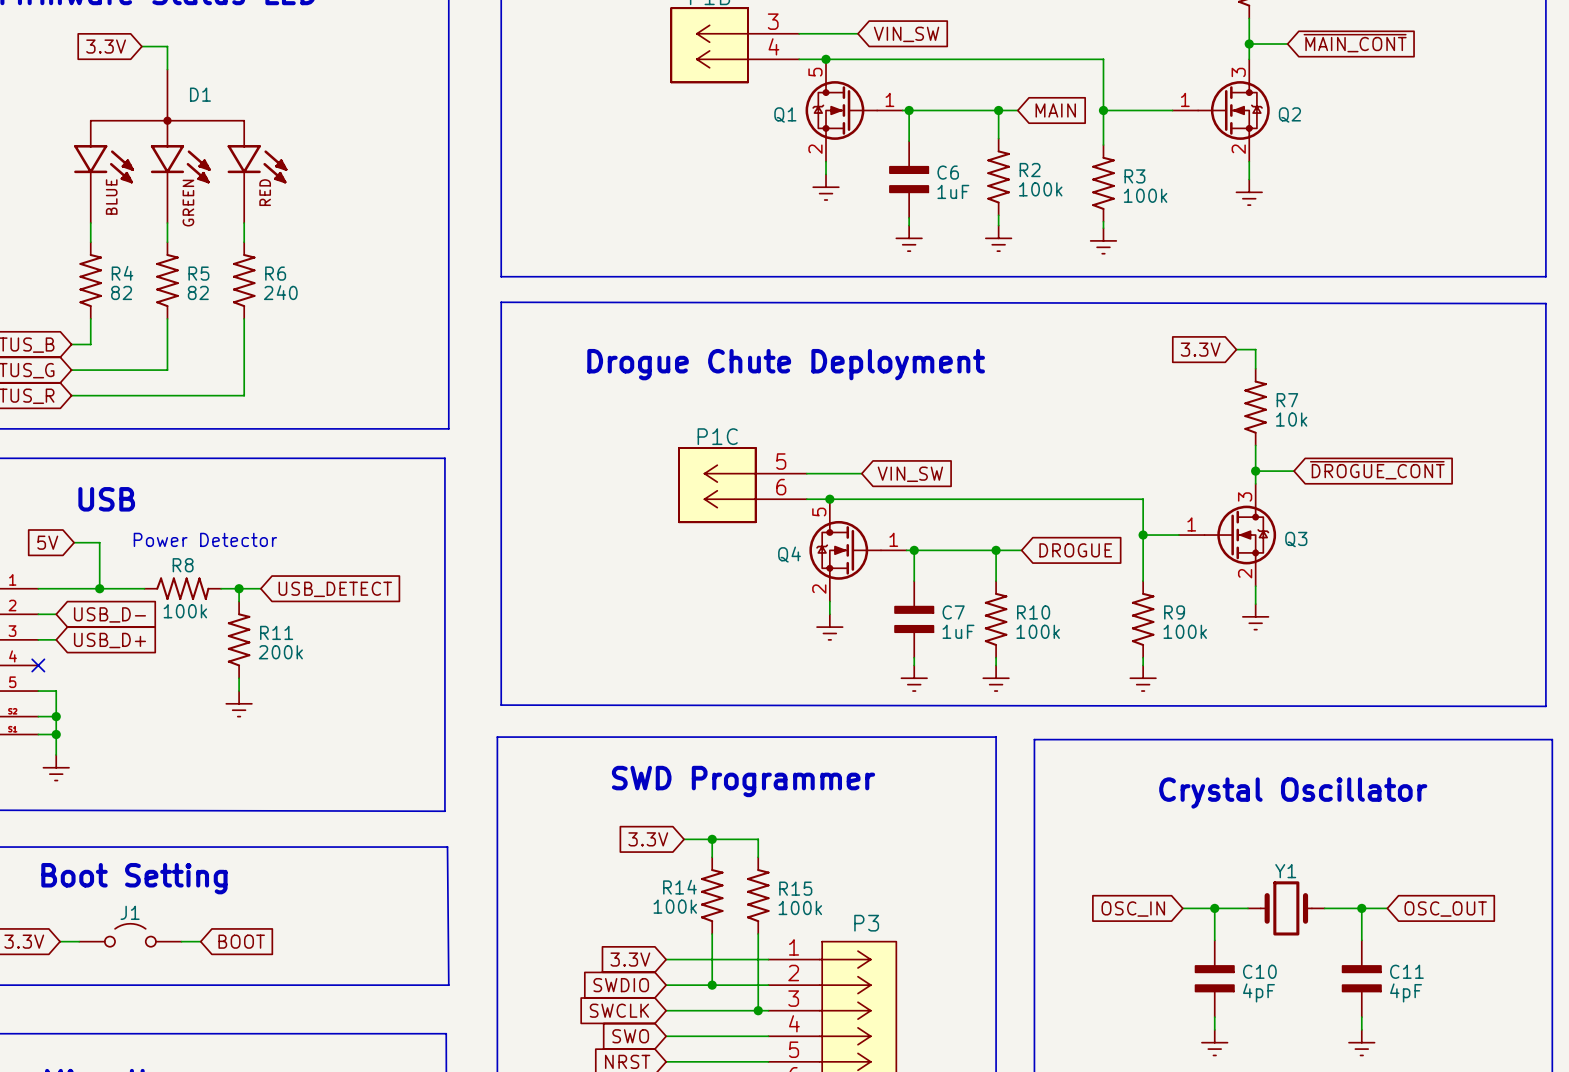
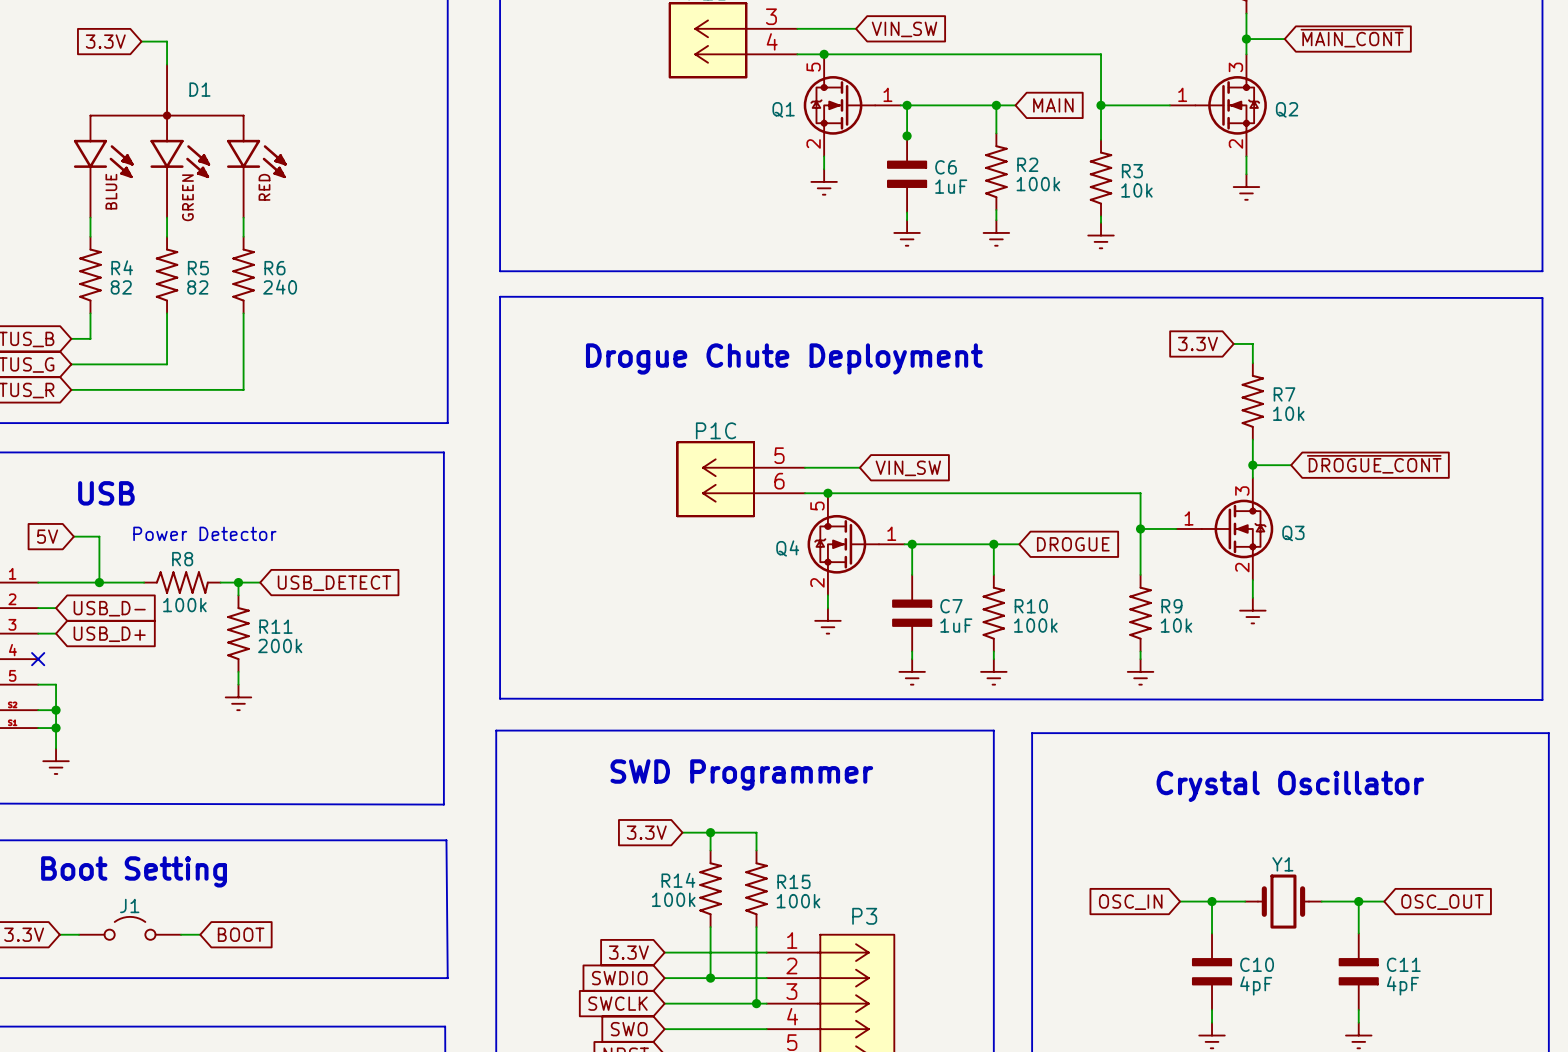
junction: none -> (907, 136)
R3 value: 100k (1145, 195) -> 10k (1136, 190)
R9 value: 100k (1185, 631) -> 10k (1176, 625)

